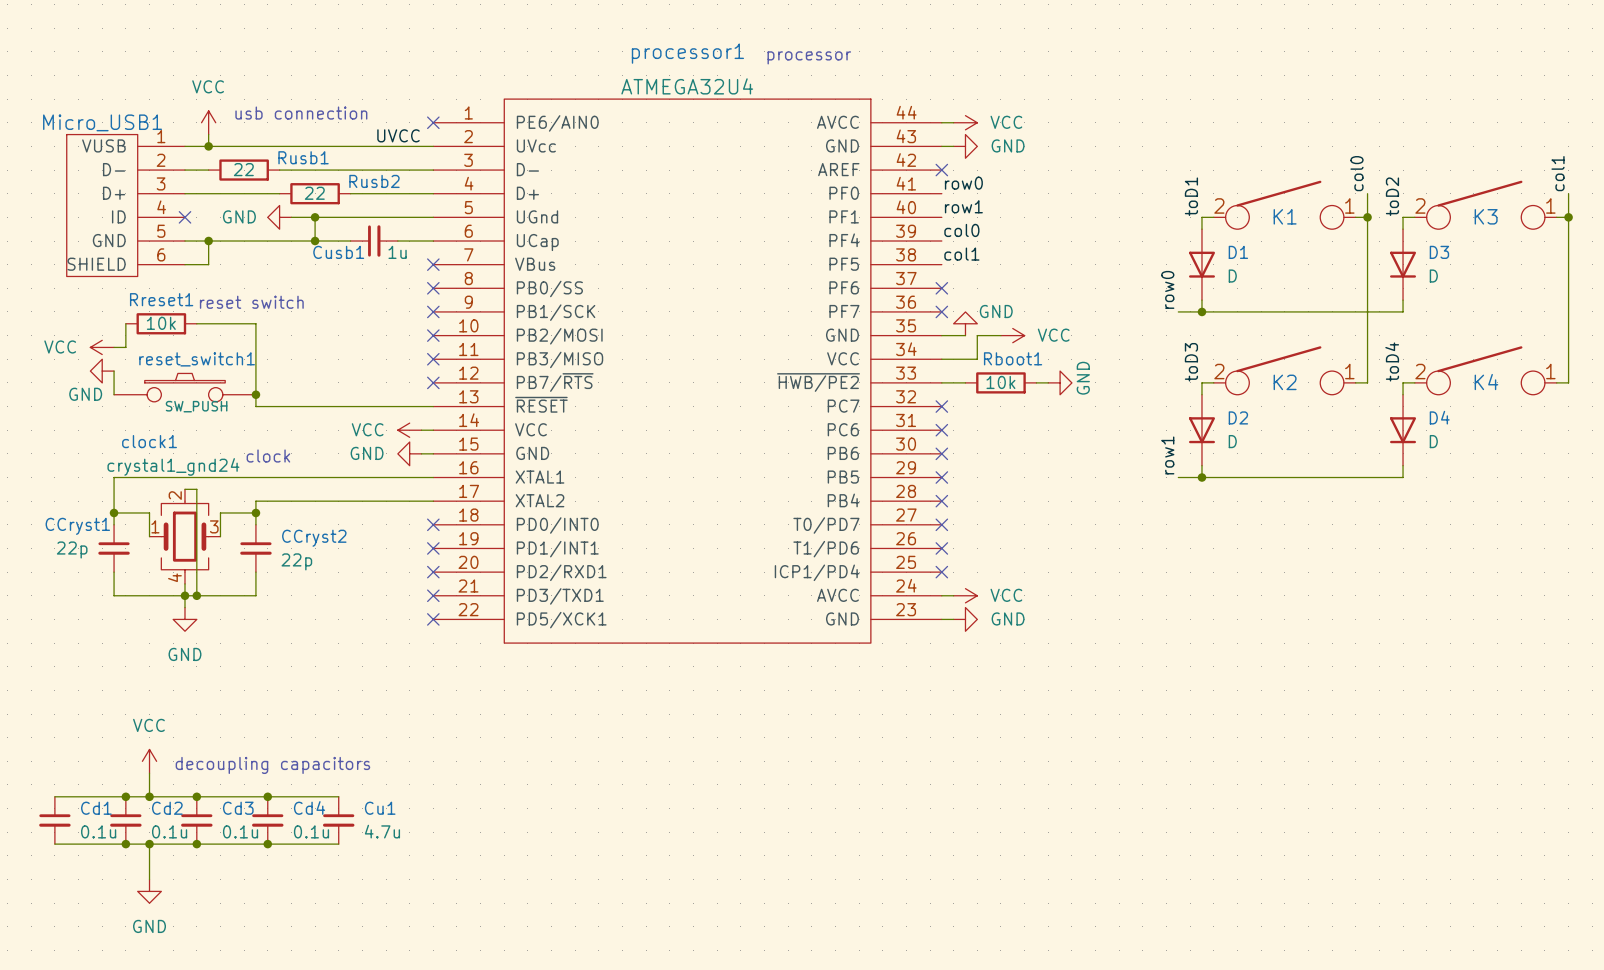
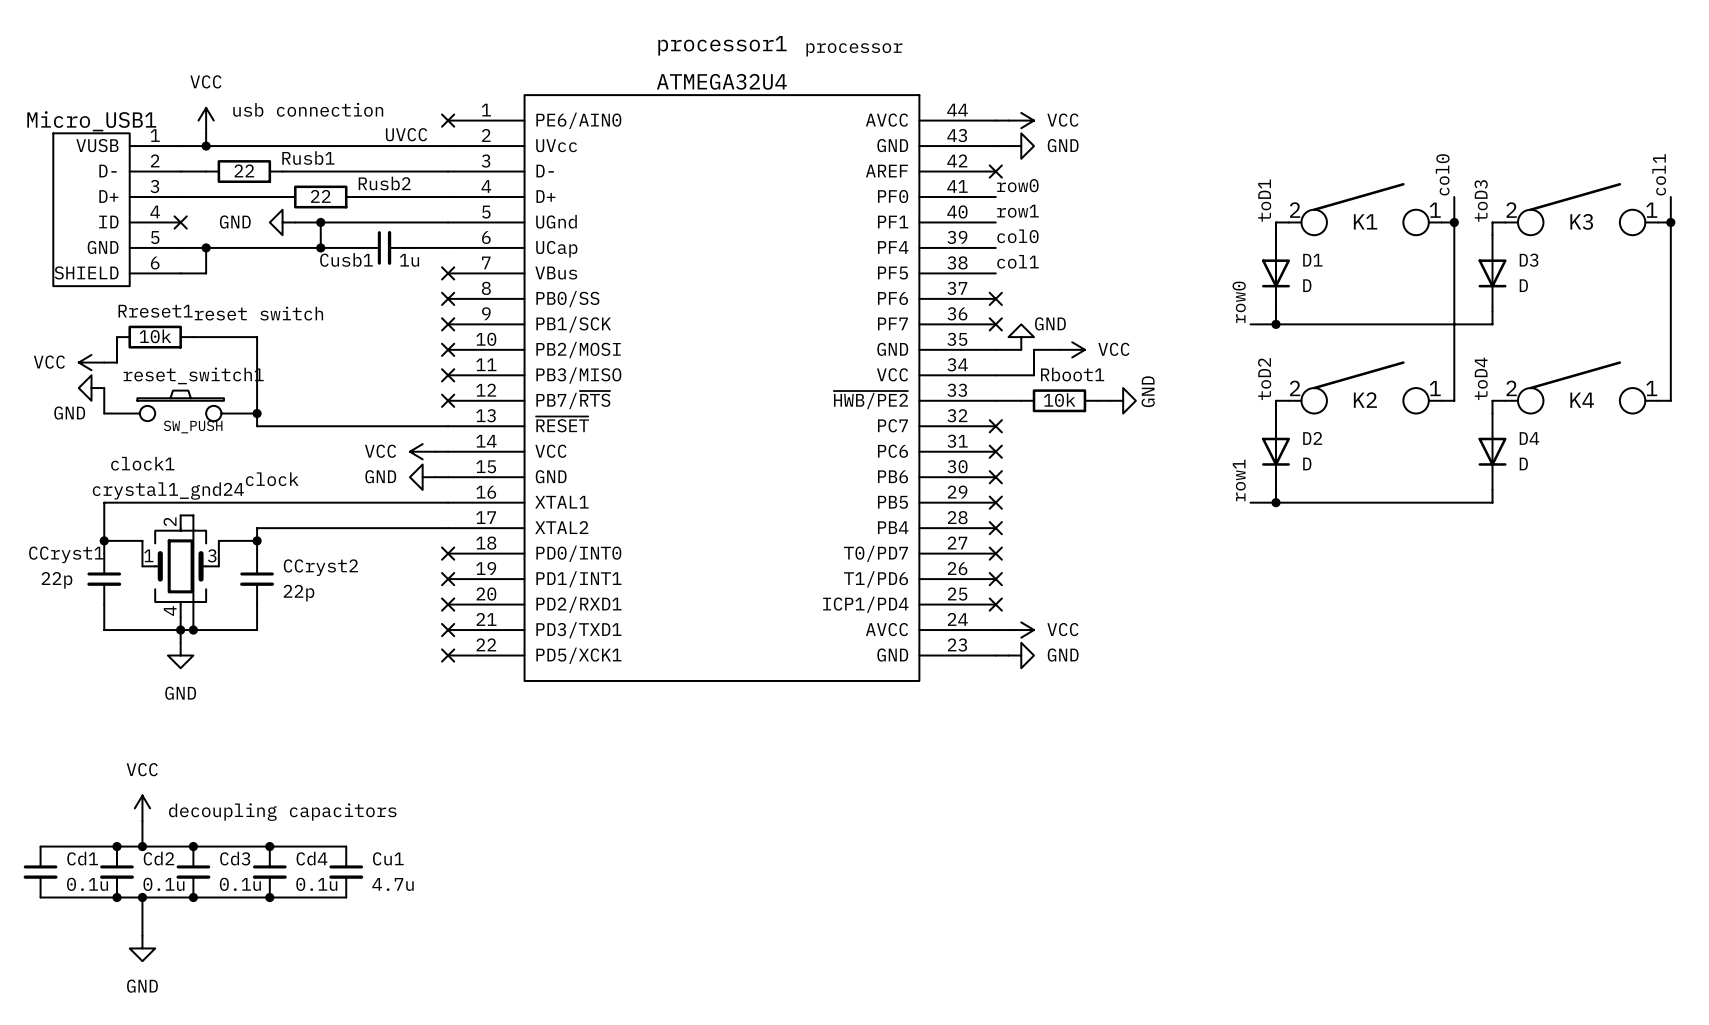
label: toD2 (1392, 196) -> toD3 (1481, 200)
label: toD3 (1191, 362) -> toD2 (1264, 379)

